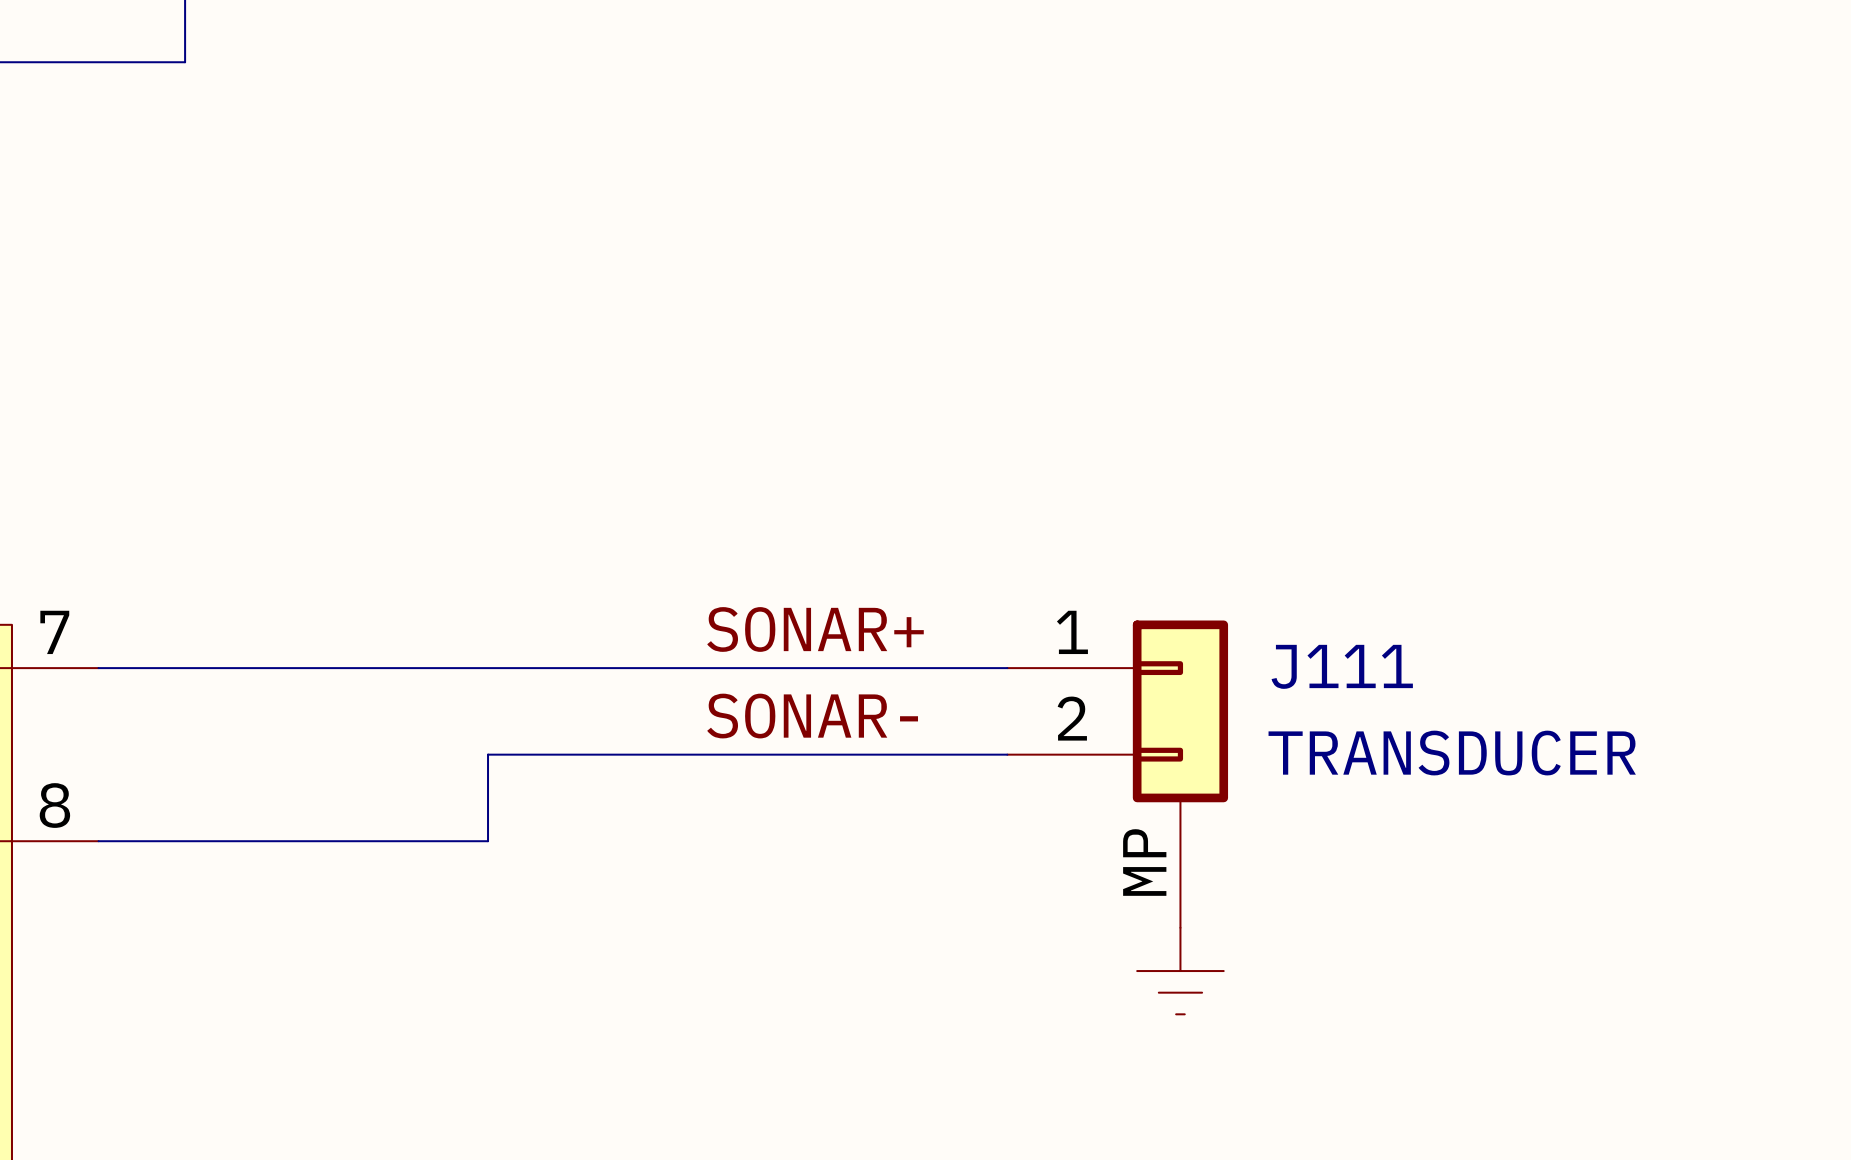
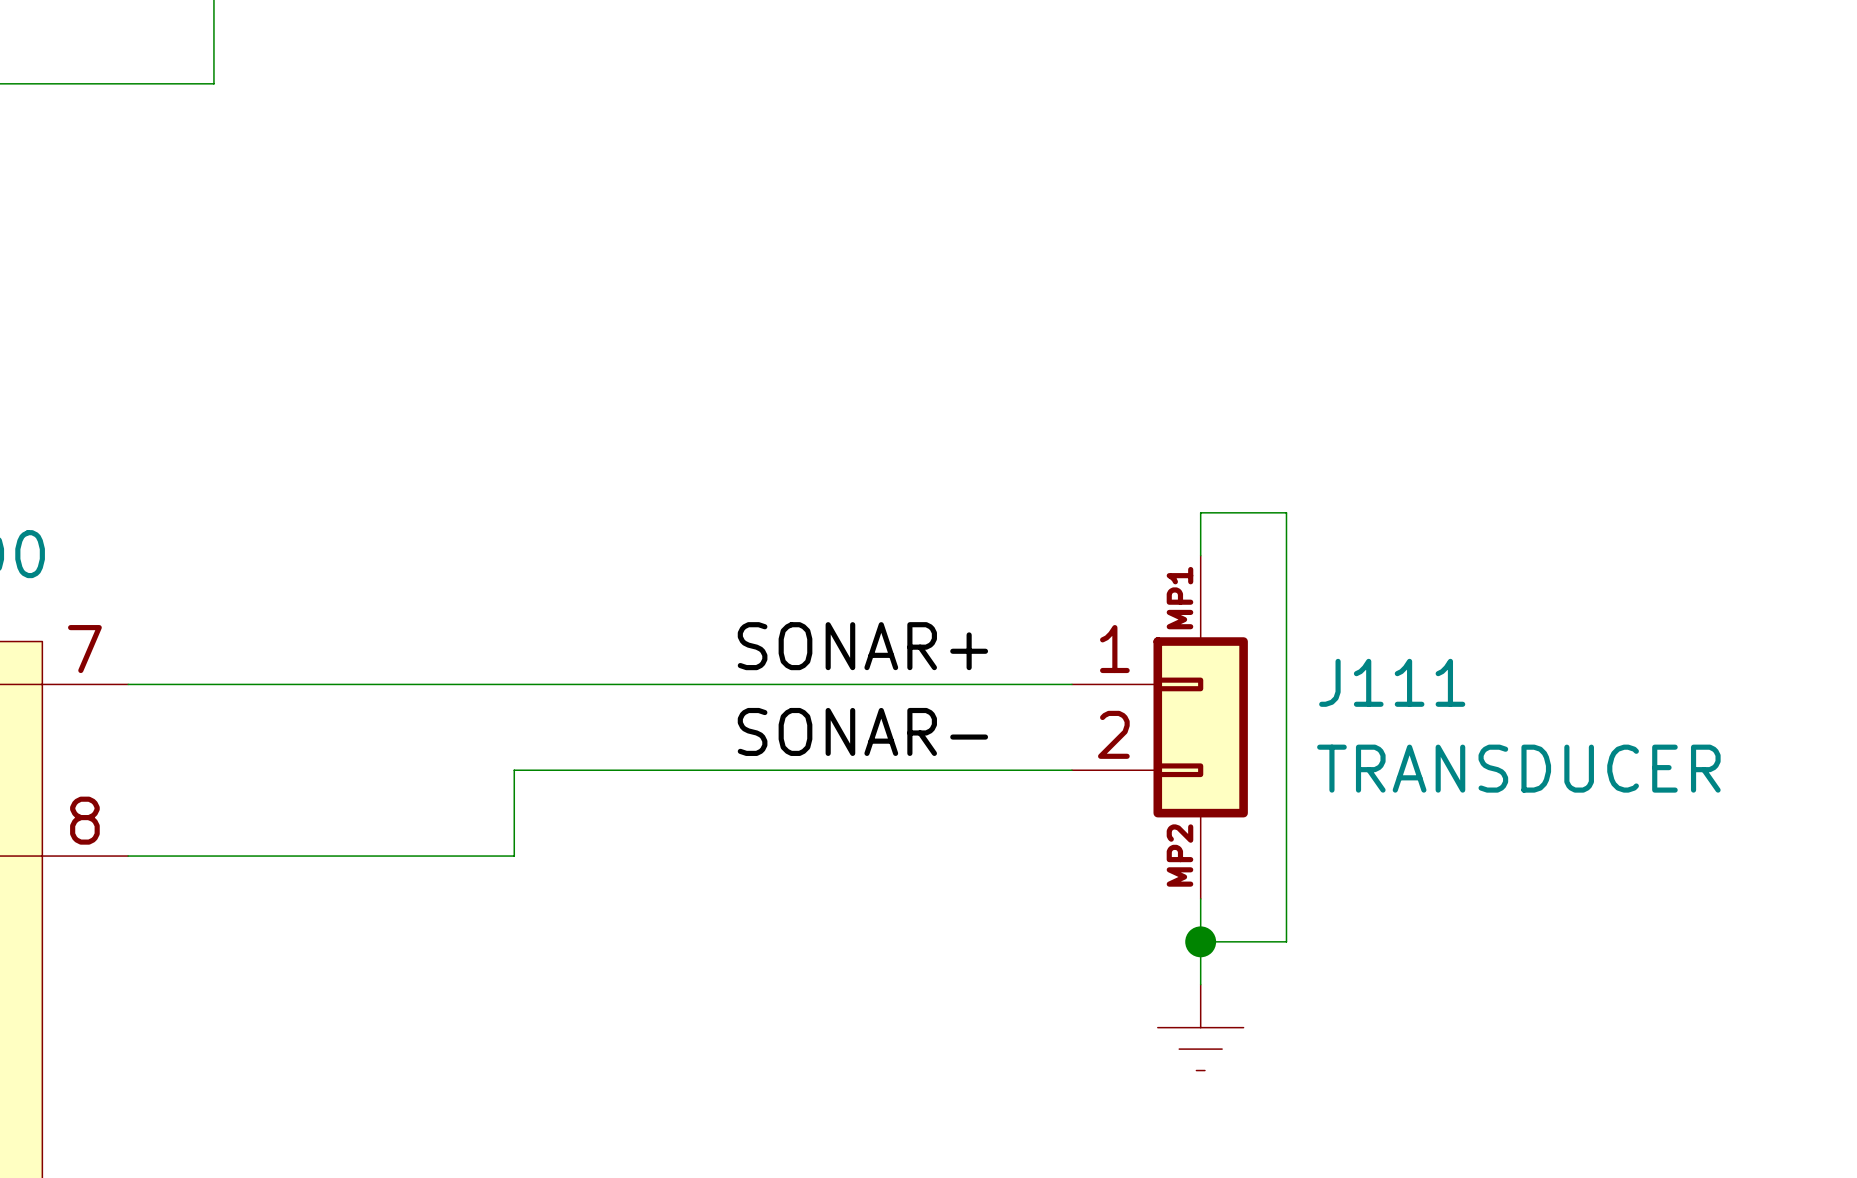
wire: none -> (1200, 555) (1200, 512) (1286, 512) (1286, 941) (1200, 941)
J111 symbol: [1007, 620, 1229, 928] -> [1071, 555, 1248, 899]
junction: none -> (1200, 941)
power symbol position: (1180, 971) -> (1200, 1027)

